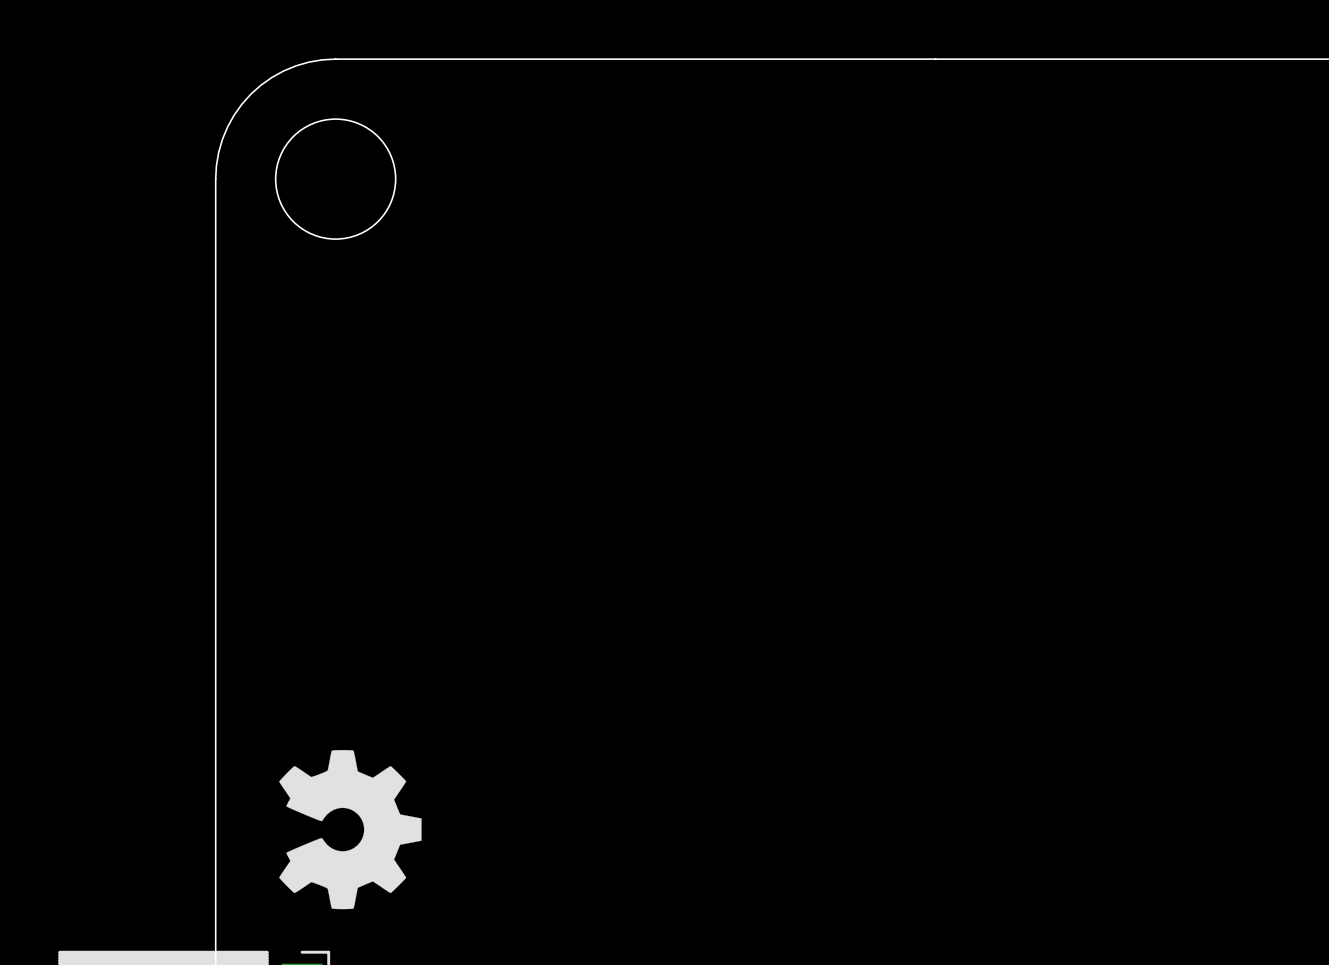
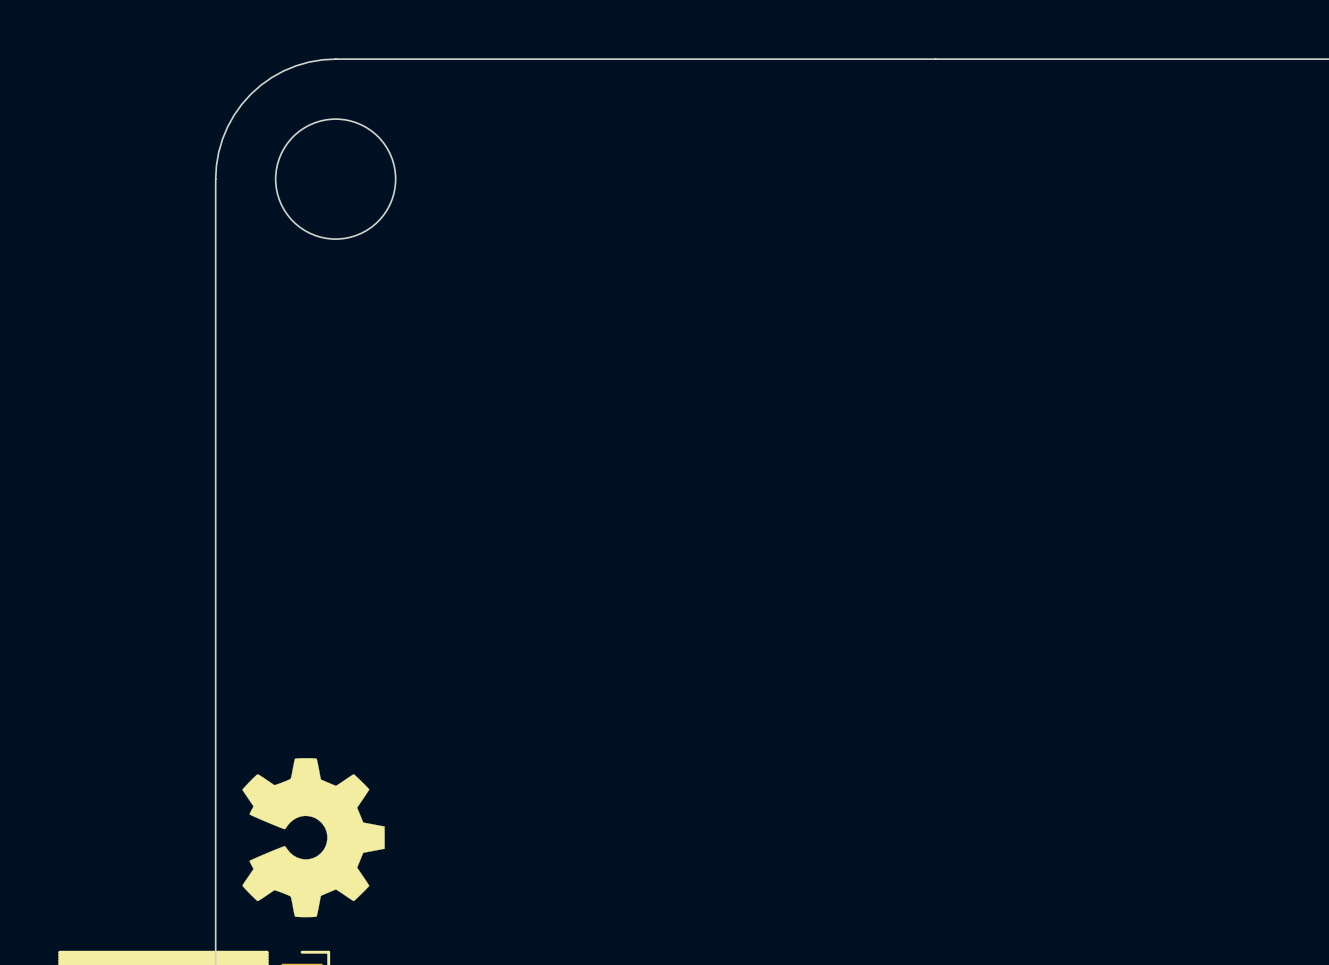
drawing position: (350, 829) -> (313, 837)

